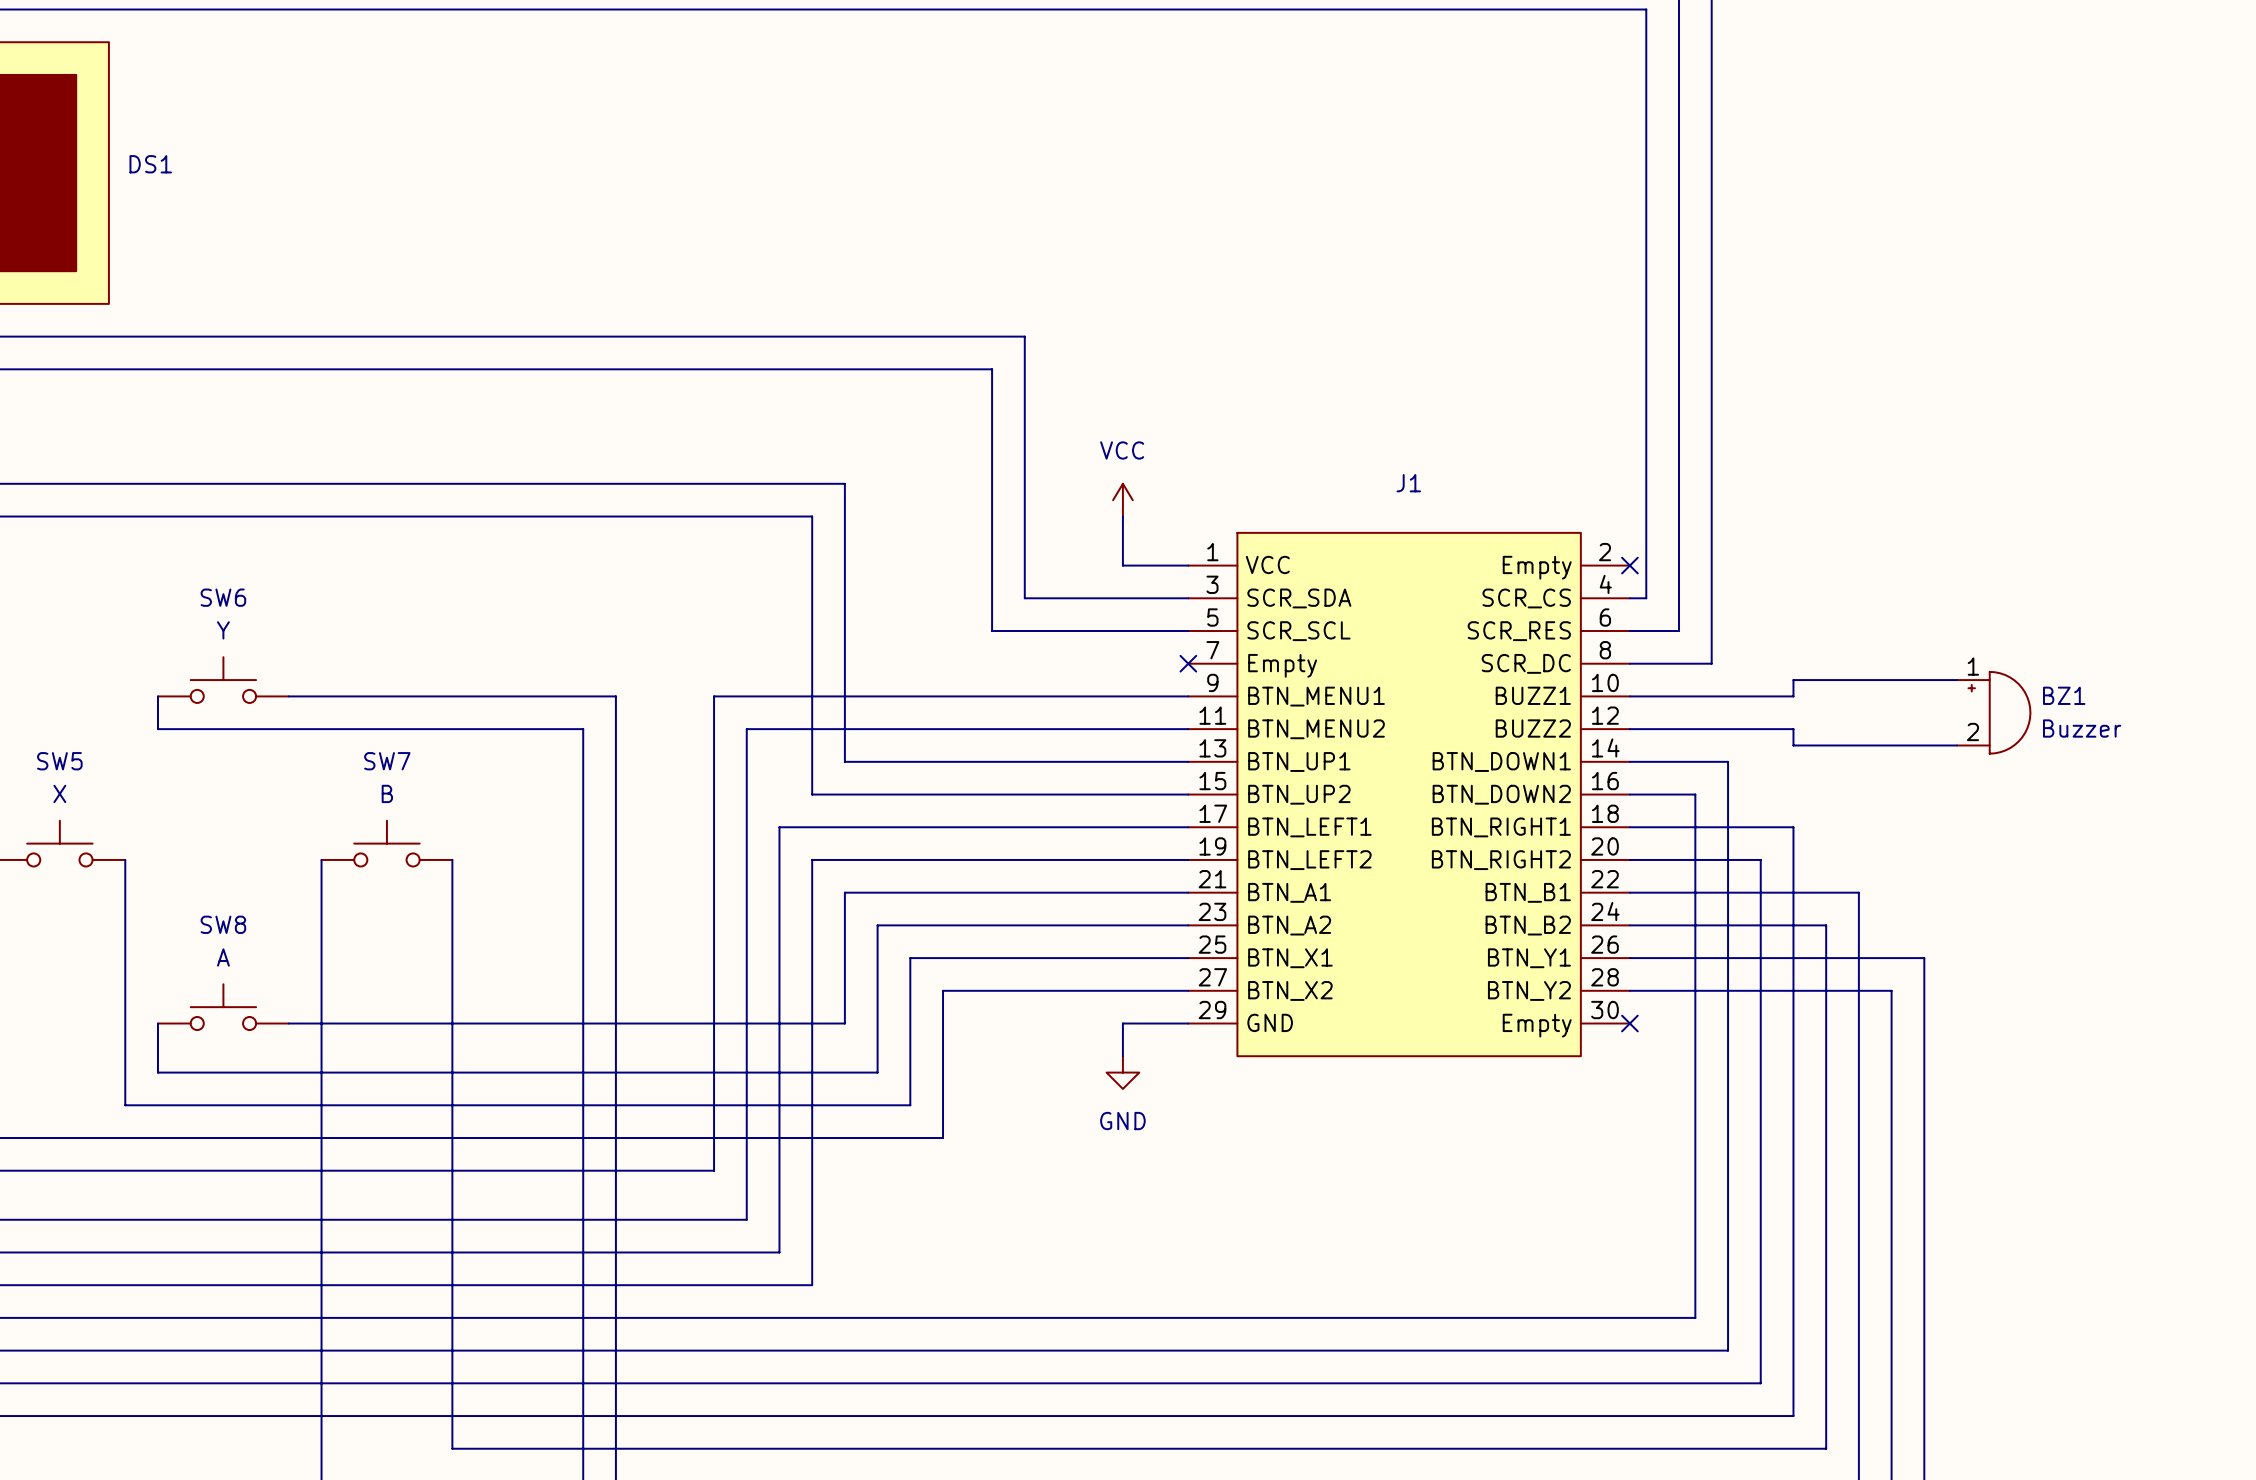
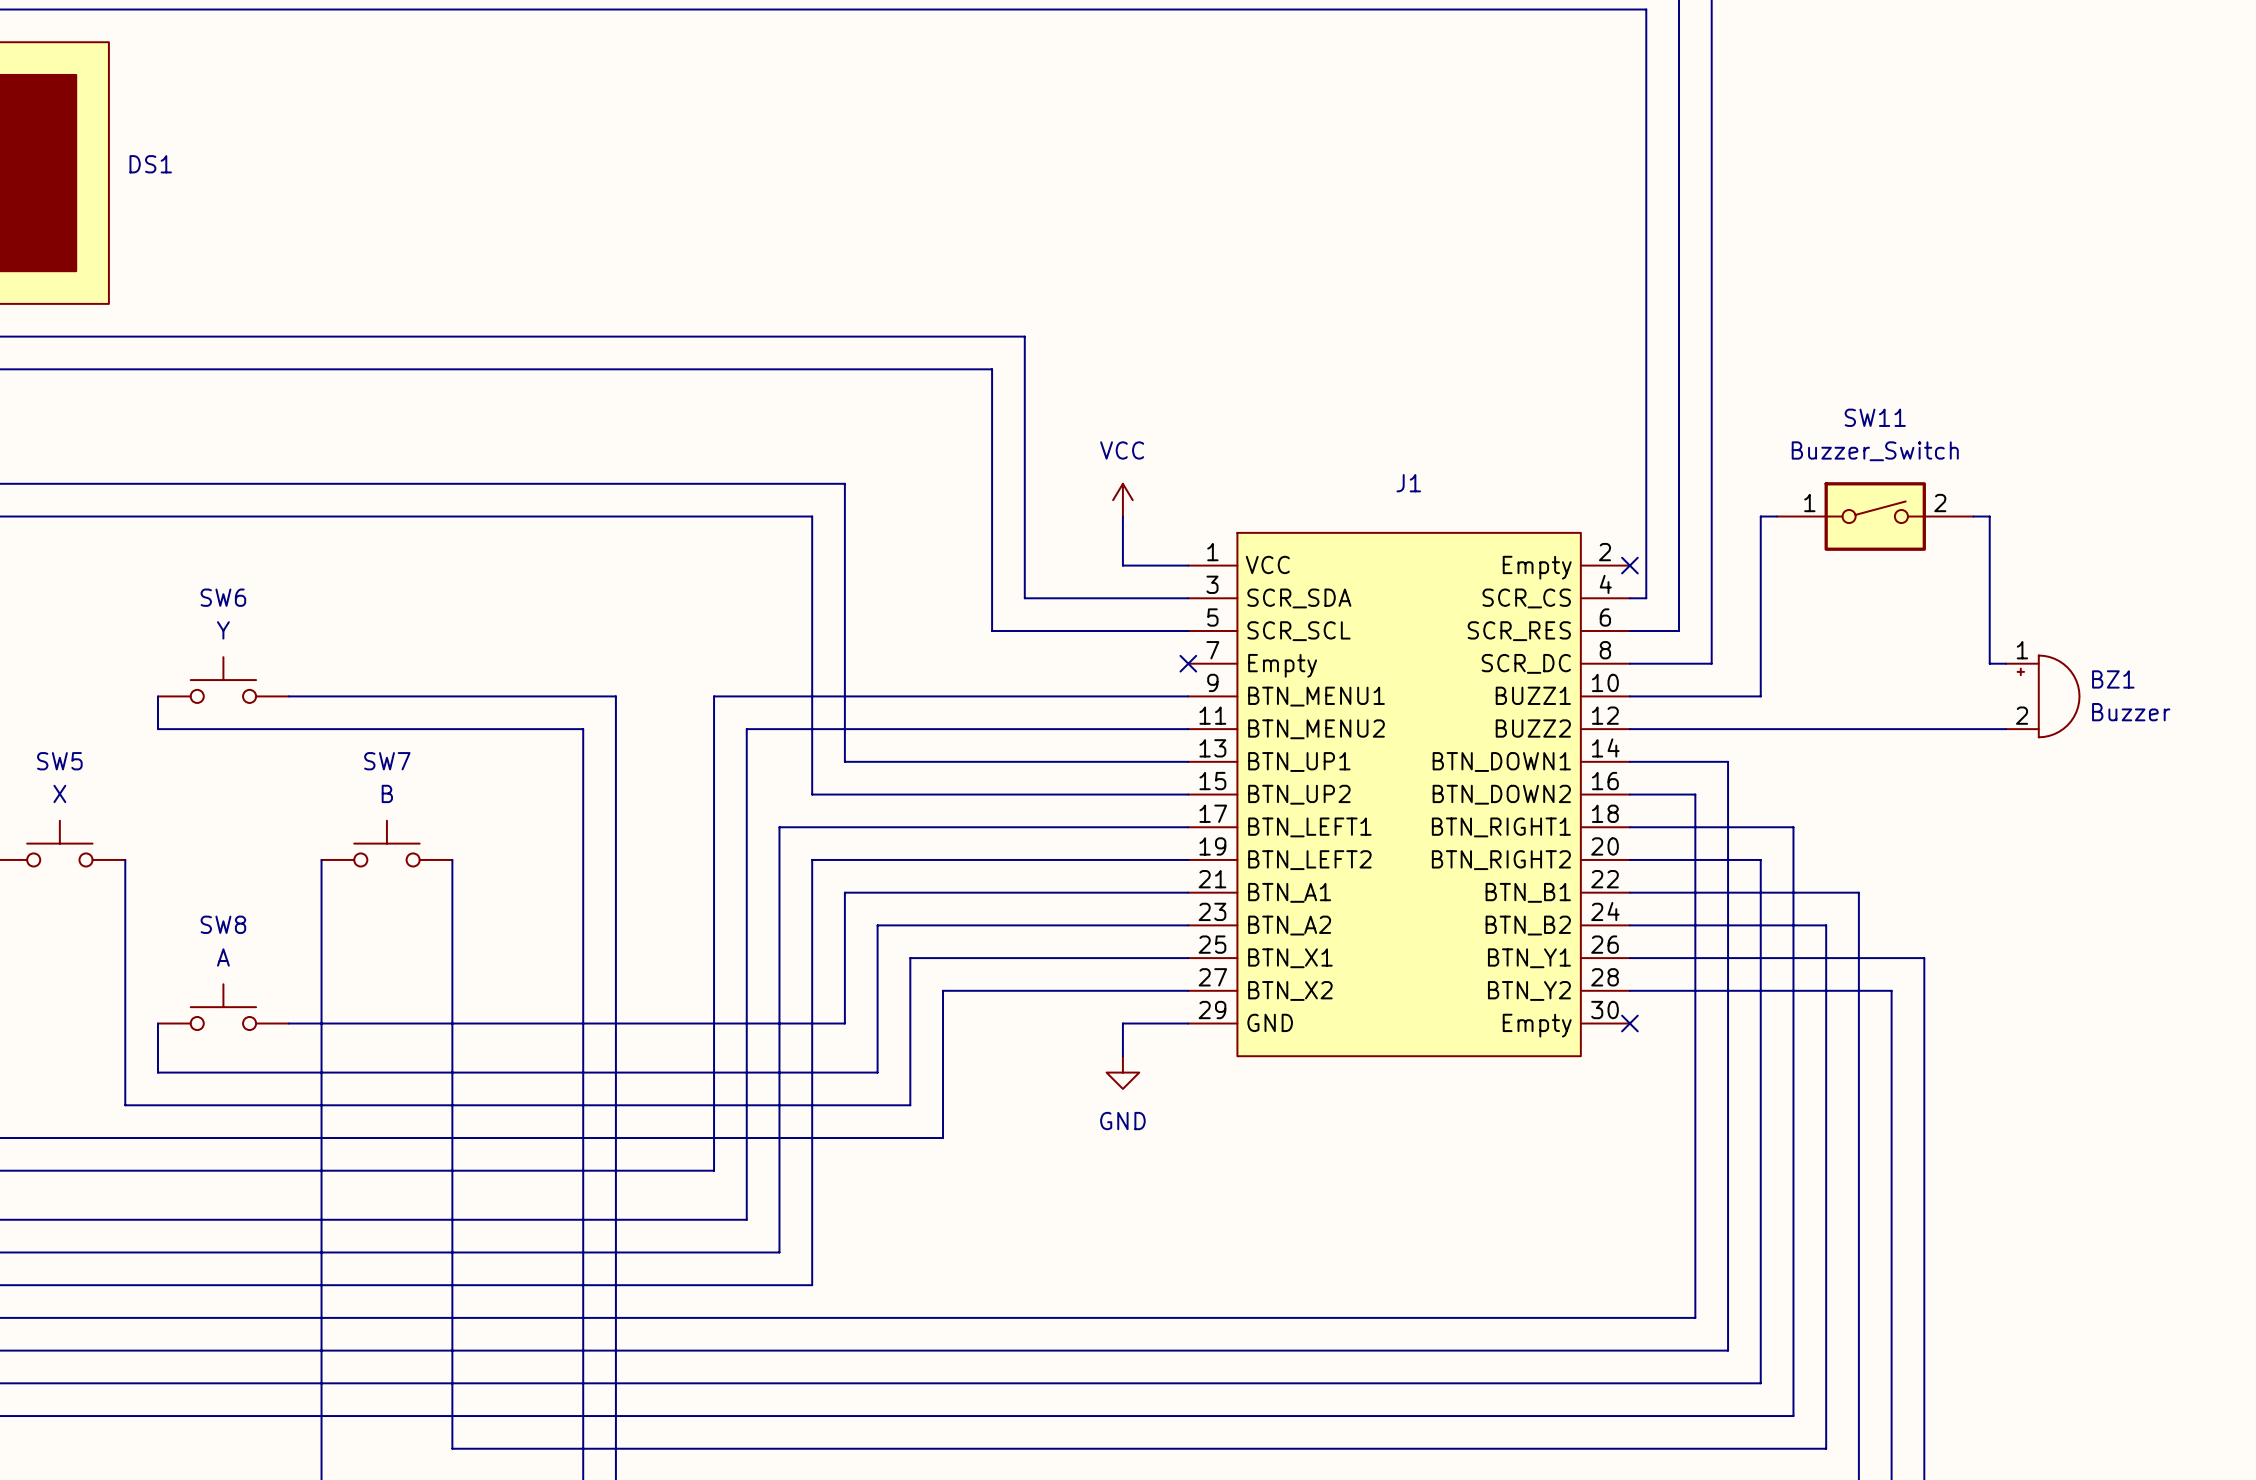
SW11: none -> Buzzer_Switch (1875, 516)
wire: none -> (1973, 516) (1989, 516) (1989, 663) (2006, 663)
wire: (1957, 680) (1793, 680) (1793, 696) (1760, 696) -> (1777, 516) (1760, 516) (1760, 696)
BZ1 position: (1993, 712) -> (2042, 696)
wire: (1793, 729) (1793, 745) (1957, 745) -> (1793, 729) (2006, 729)

